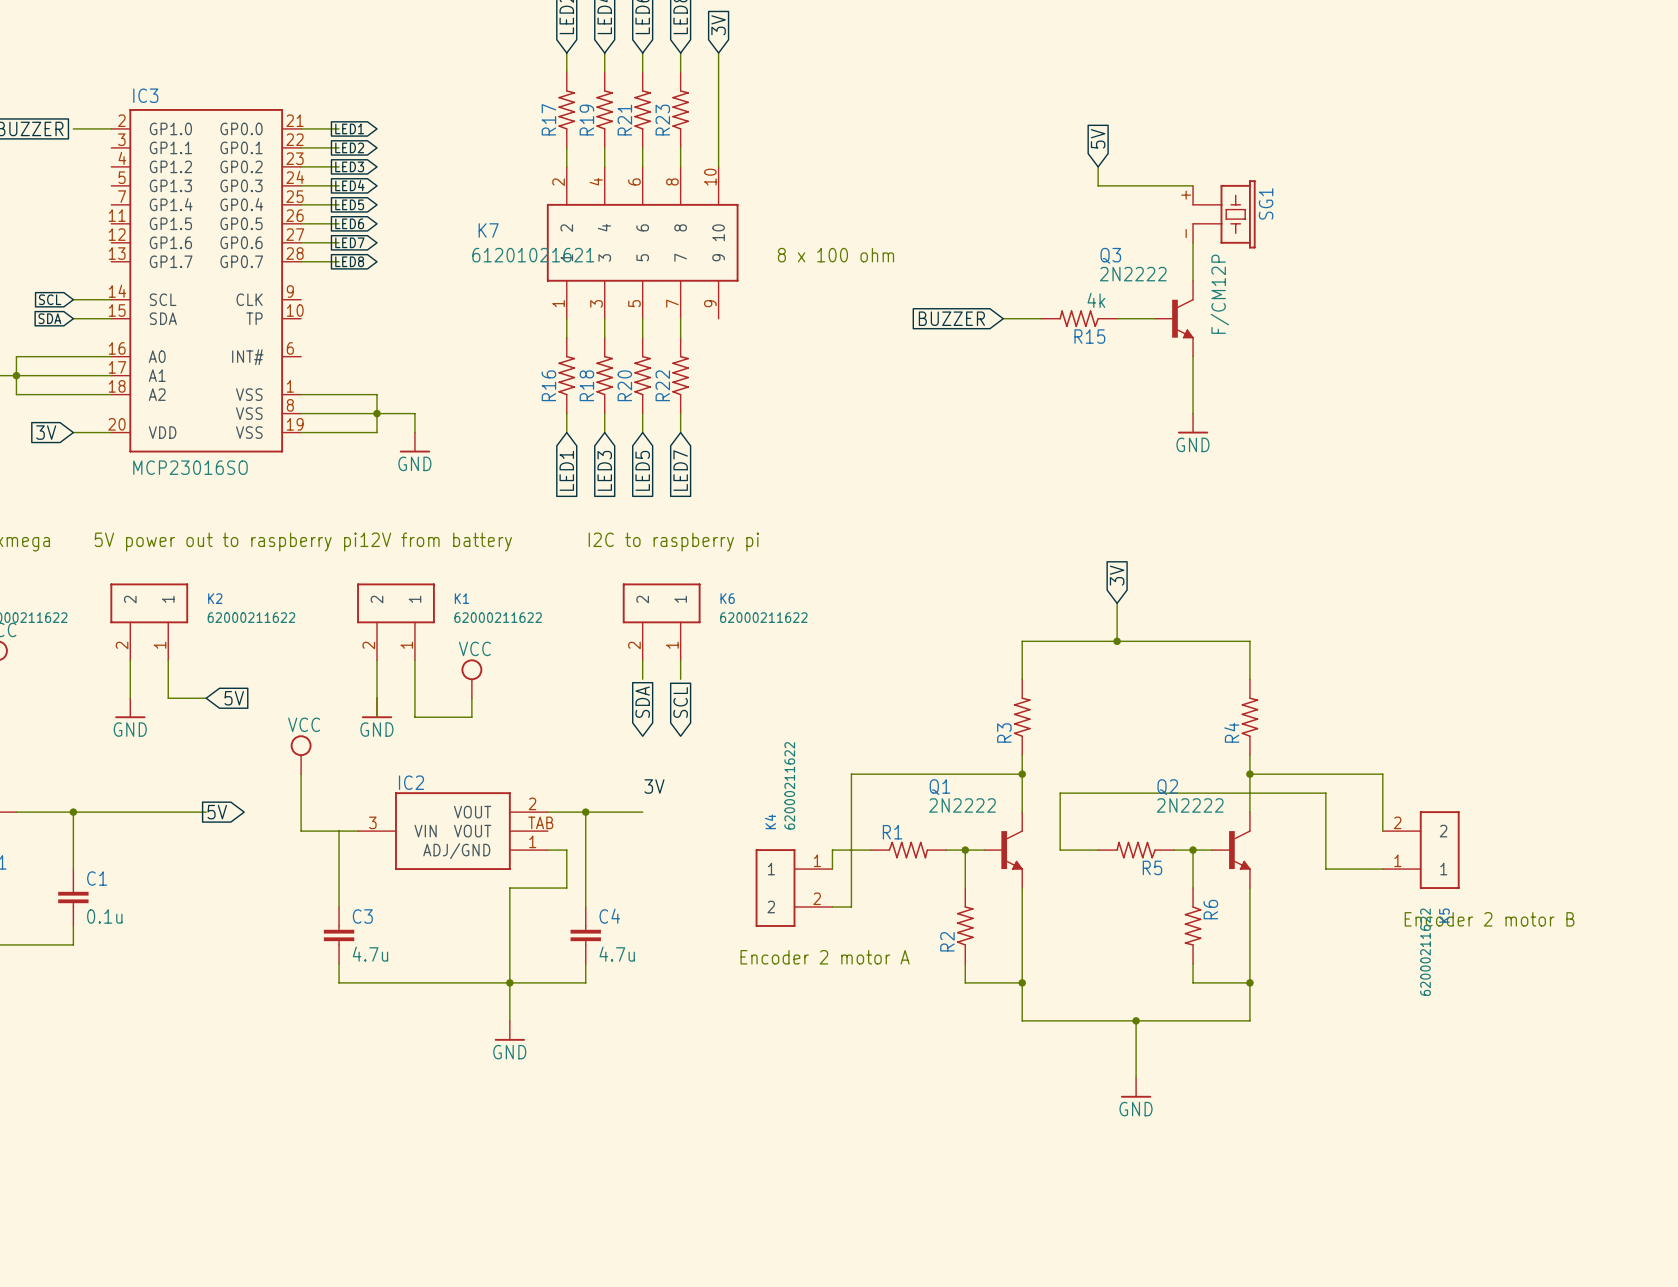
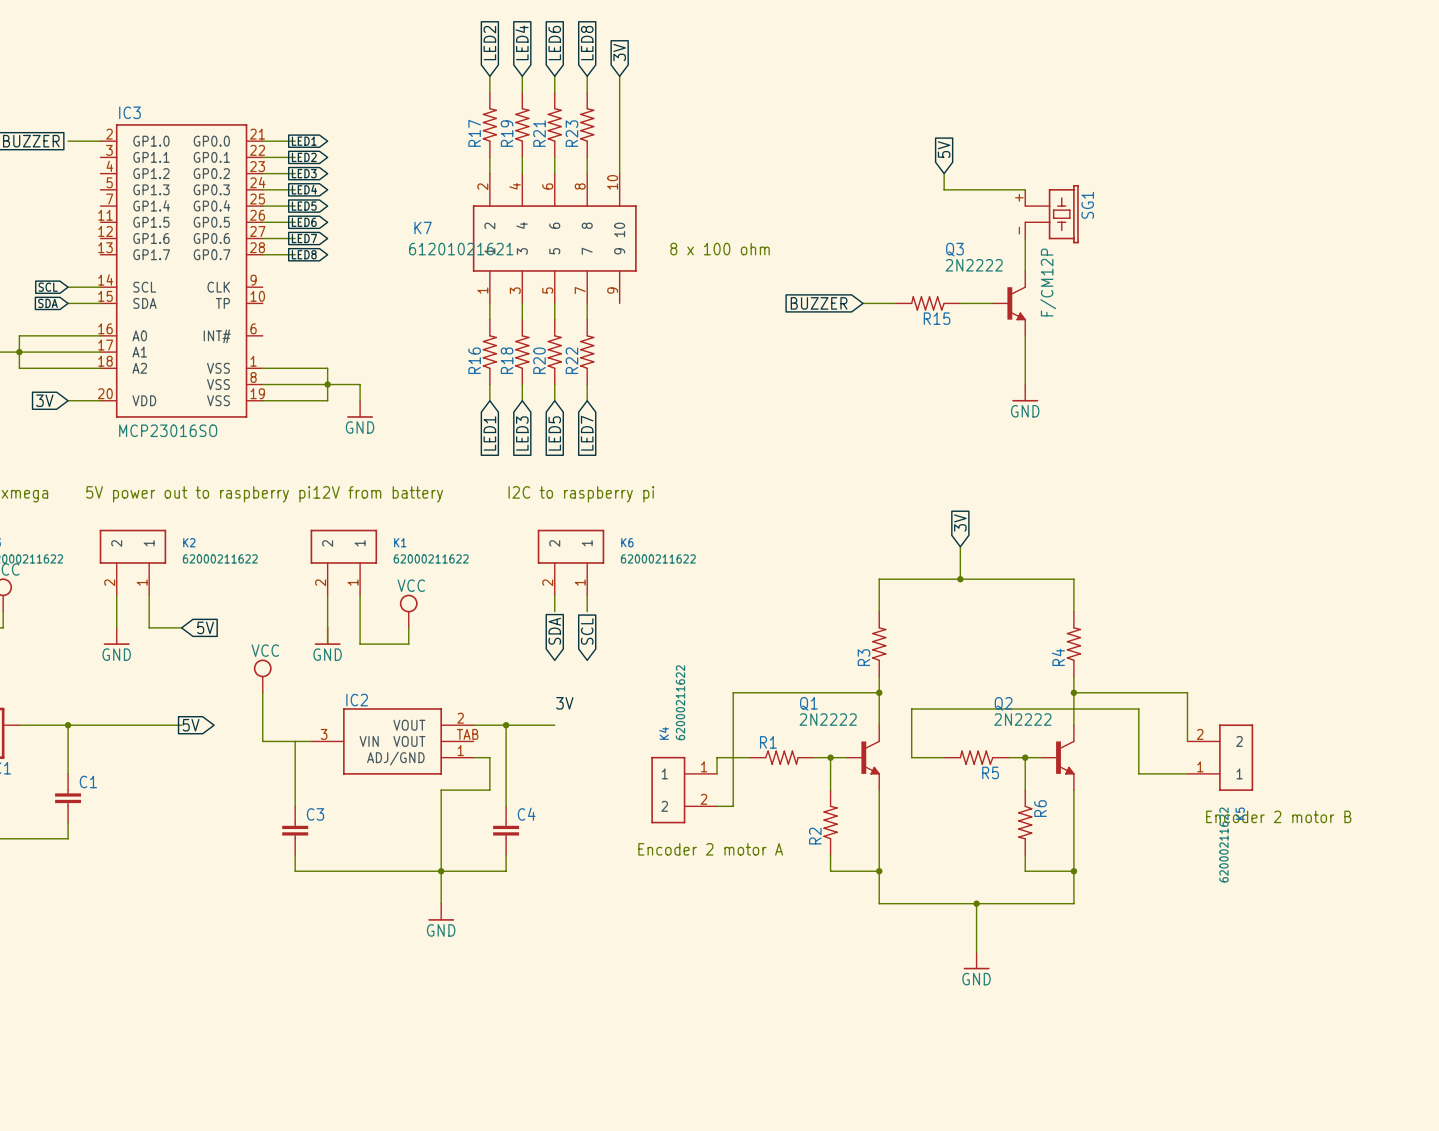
R15 value: 4k (1096, 300) -> none
C1 value: 0.1u (104, 916) -> none
C3 value: 4.7u (370, 954) -> none
C4 value: 4.7u (617, 954) -> none

